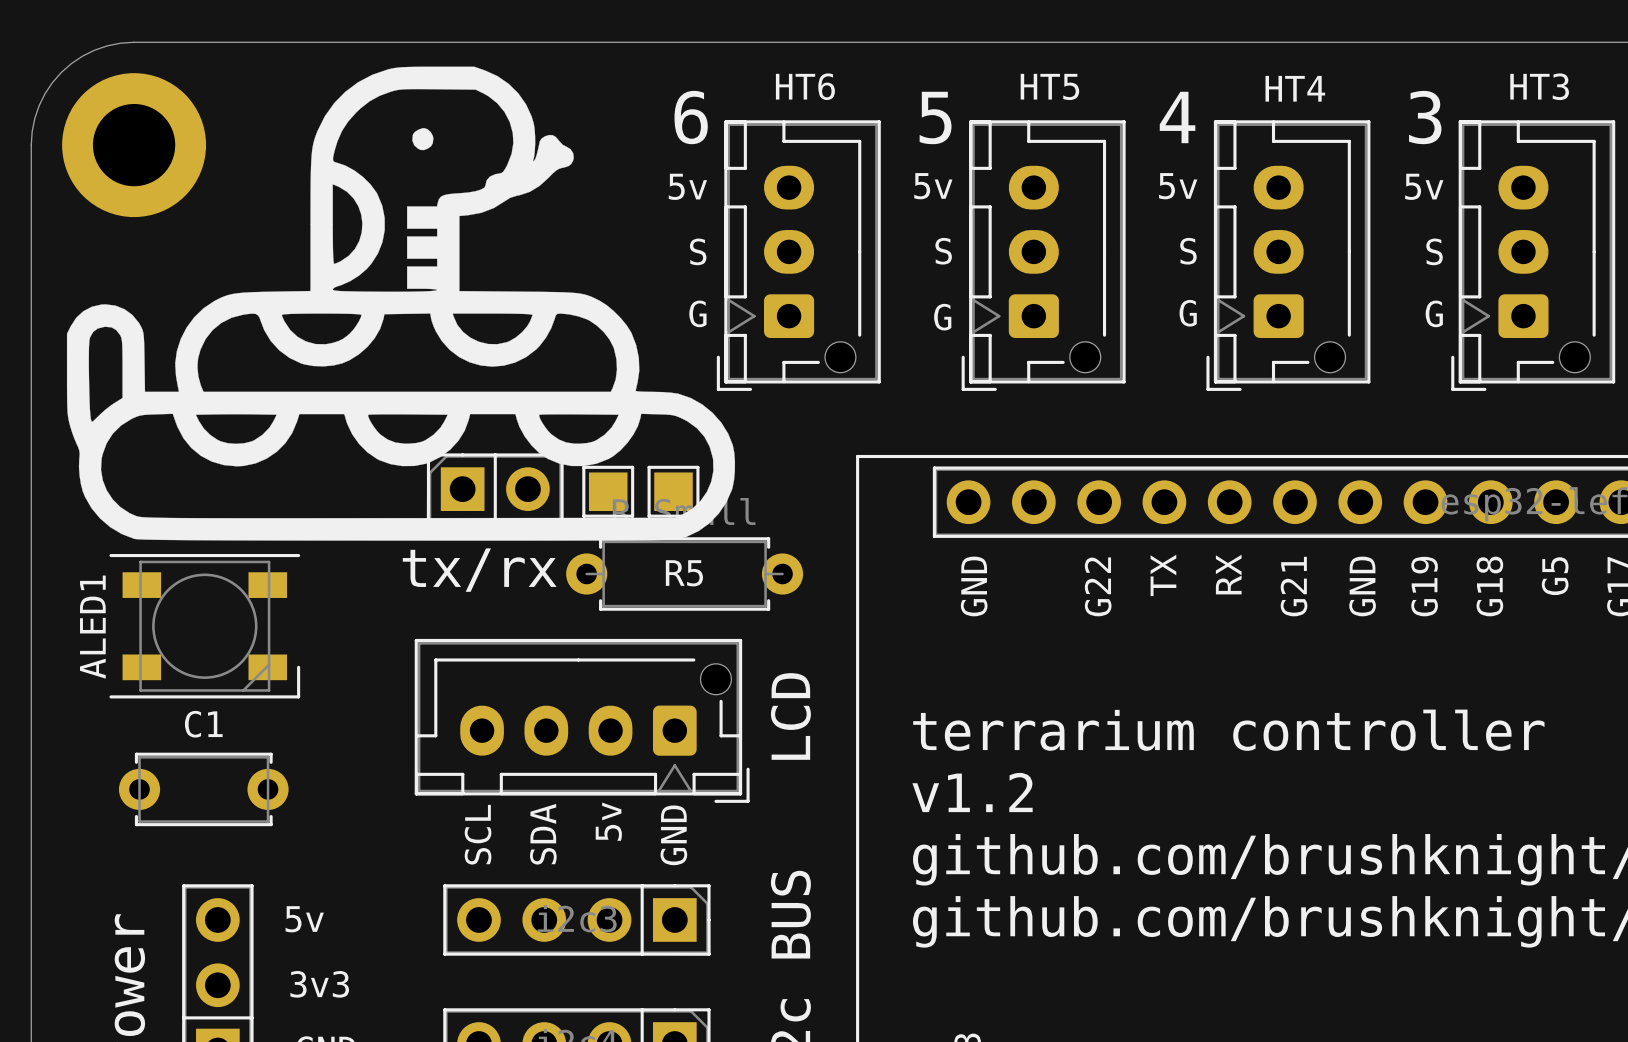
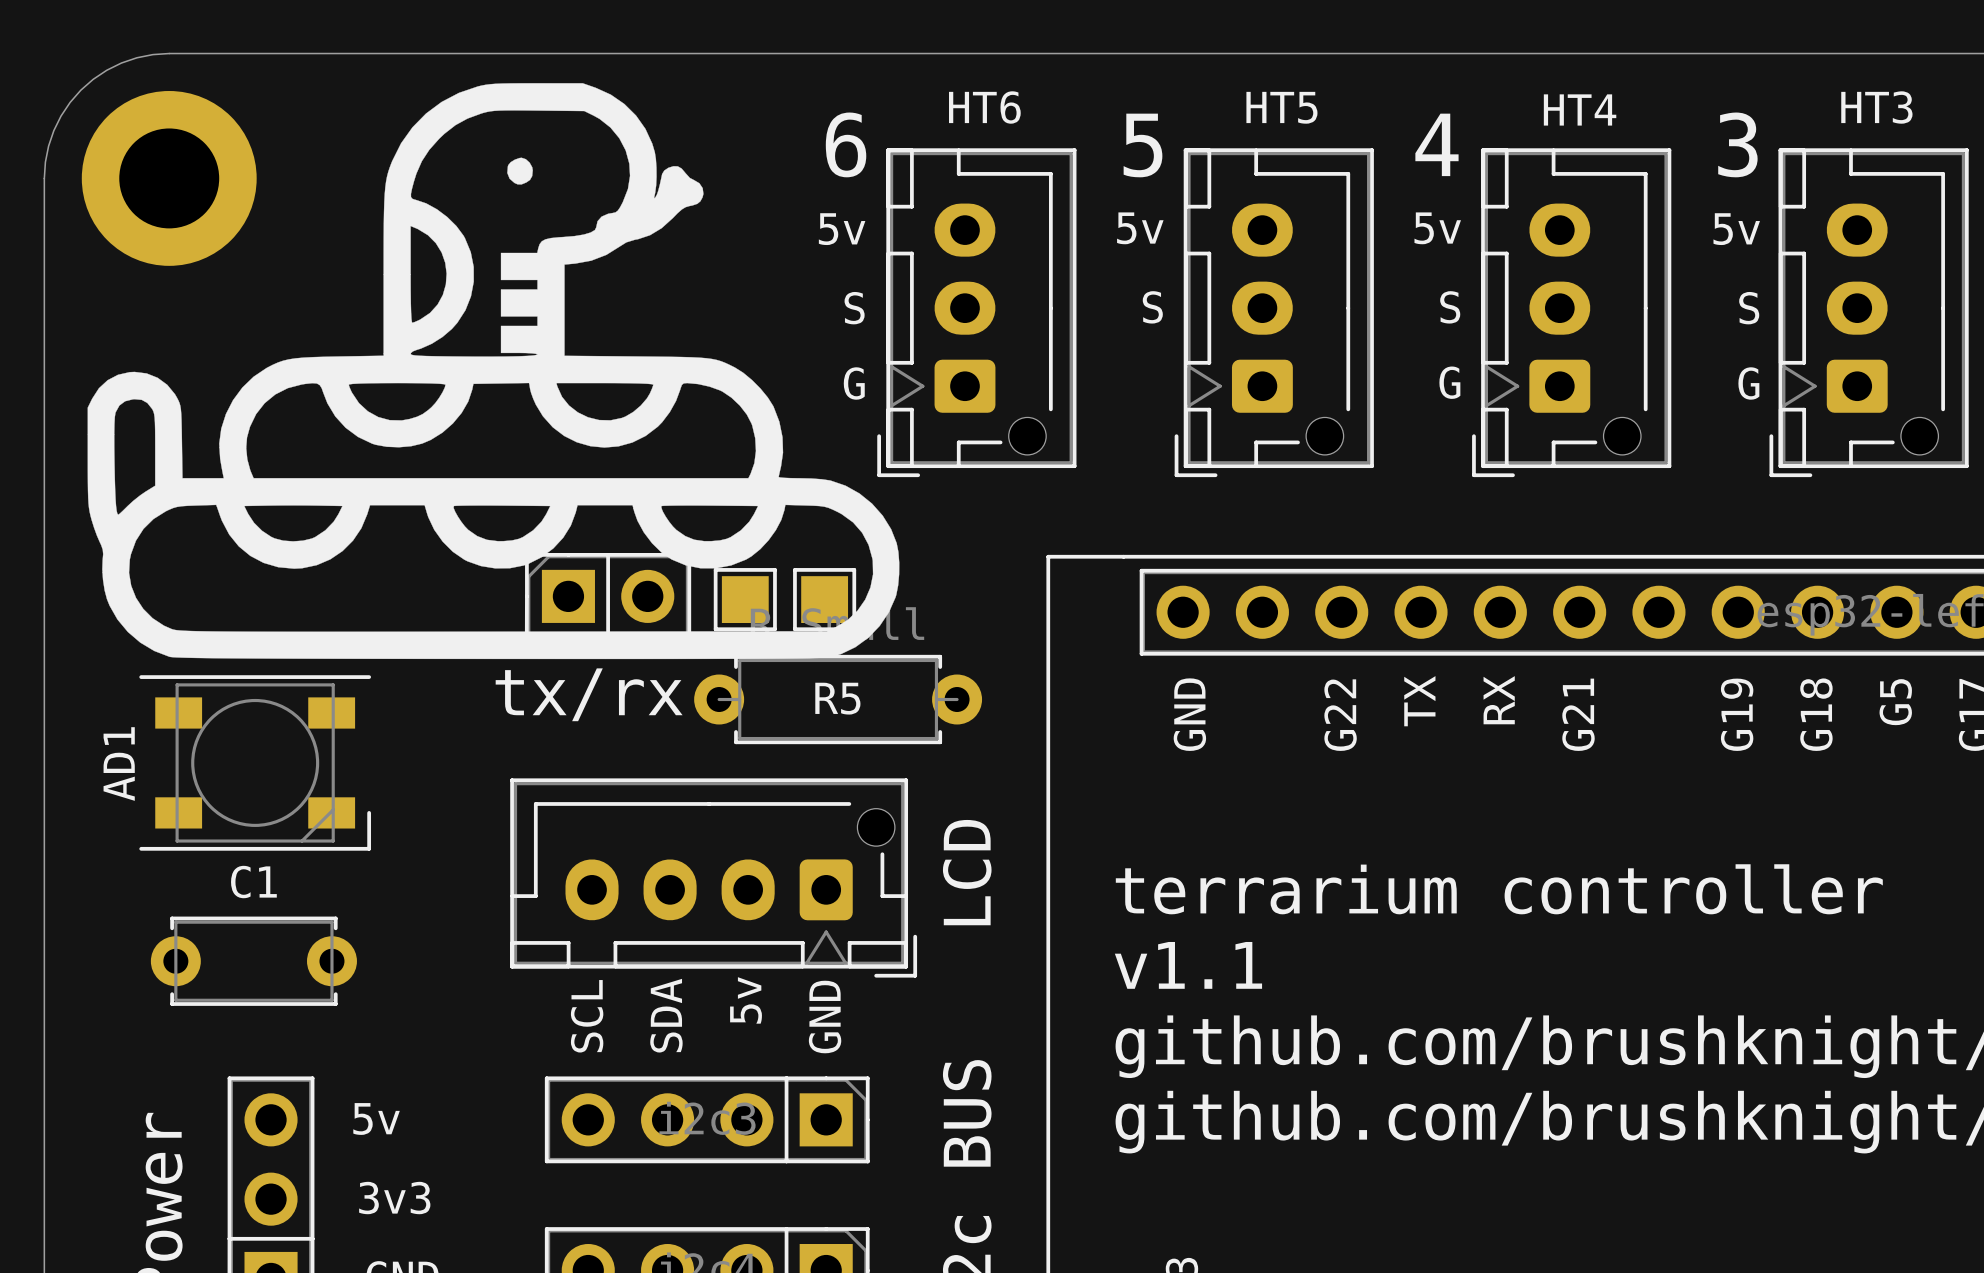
text: G (942, 317) -> none
text: GND (1362, 586) -> none
ALED1 name: ALED1 (92, 627) -> AD1 (119, 764)
text: v1.2 (972, 792) -> v1.1 (1188, 965)

